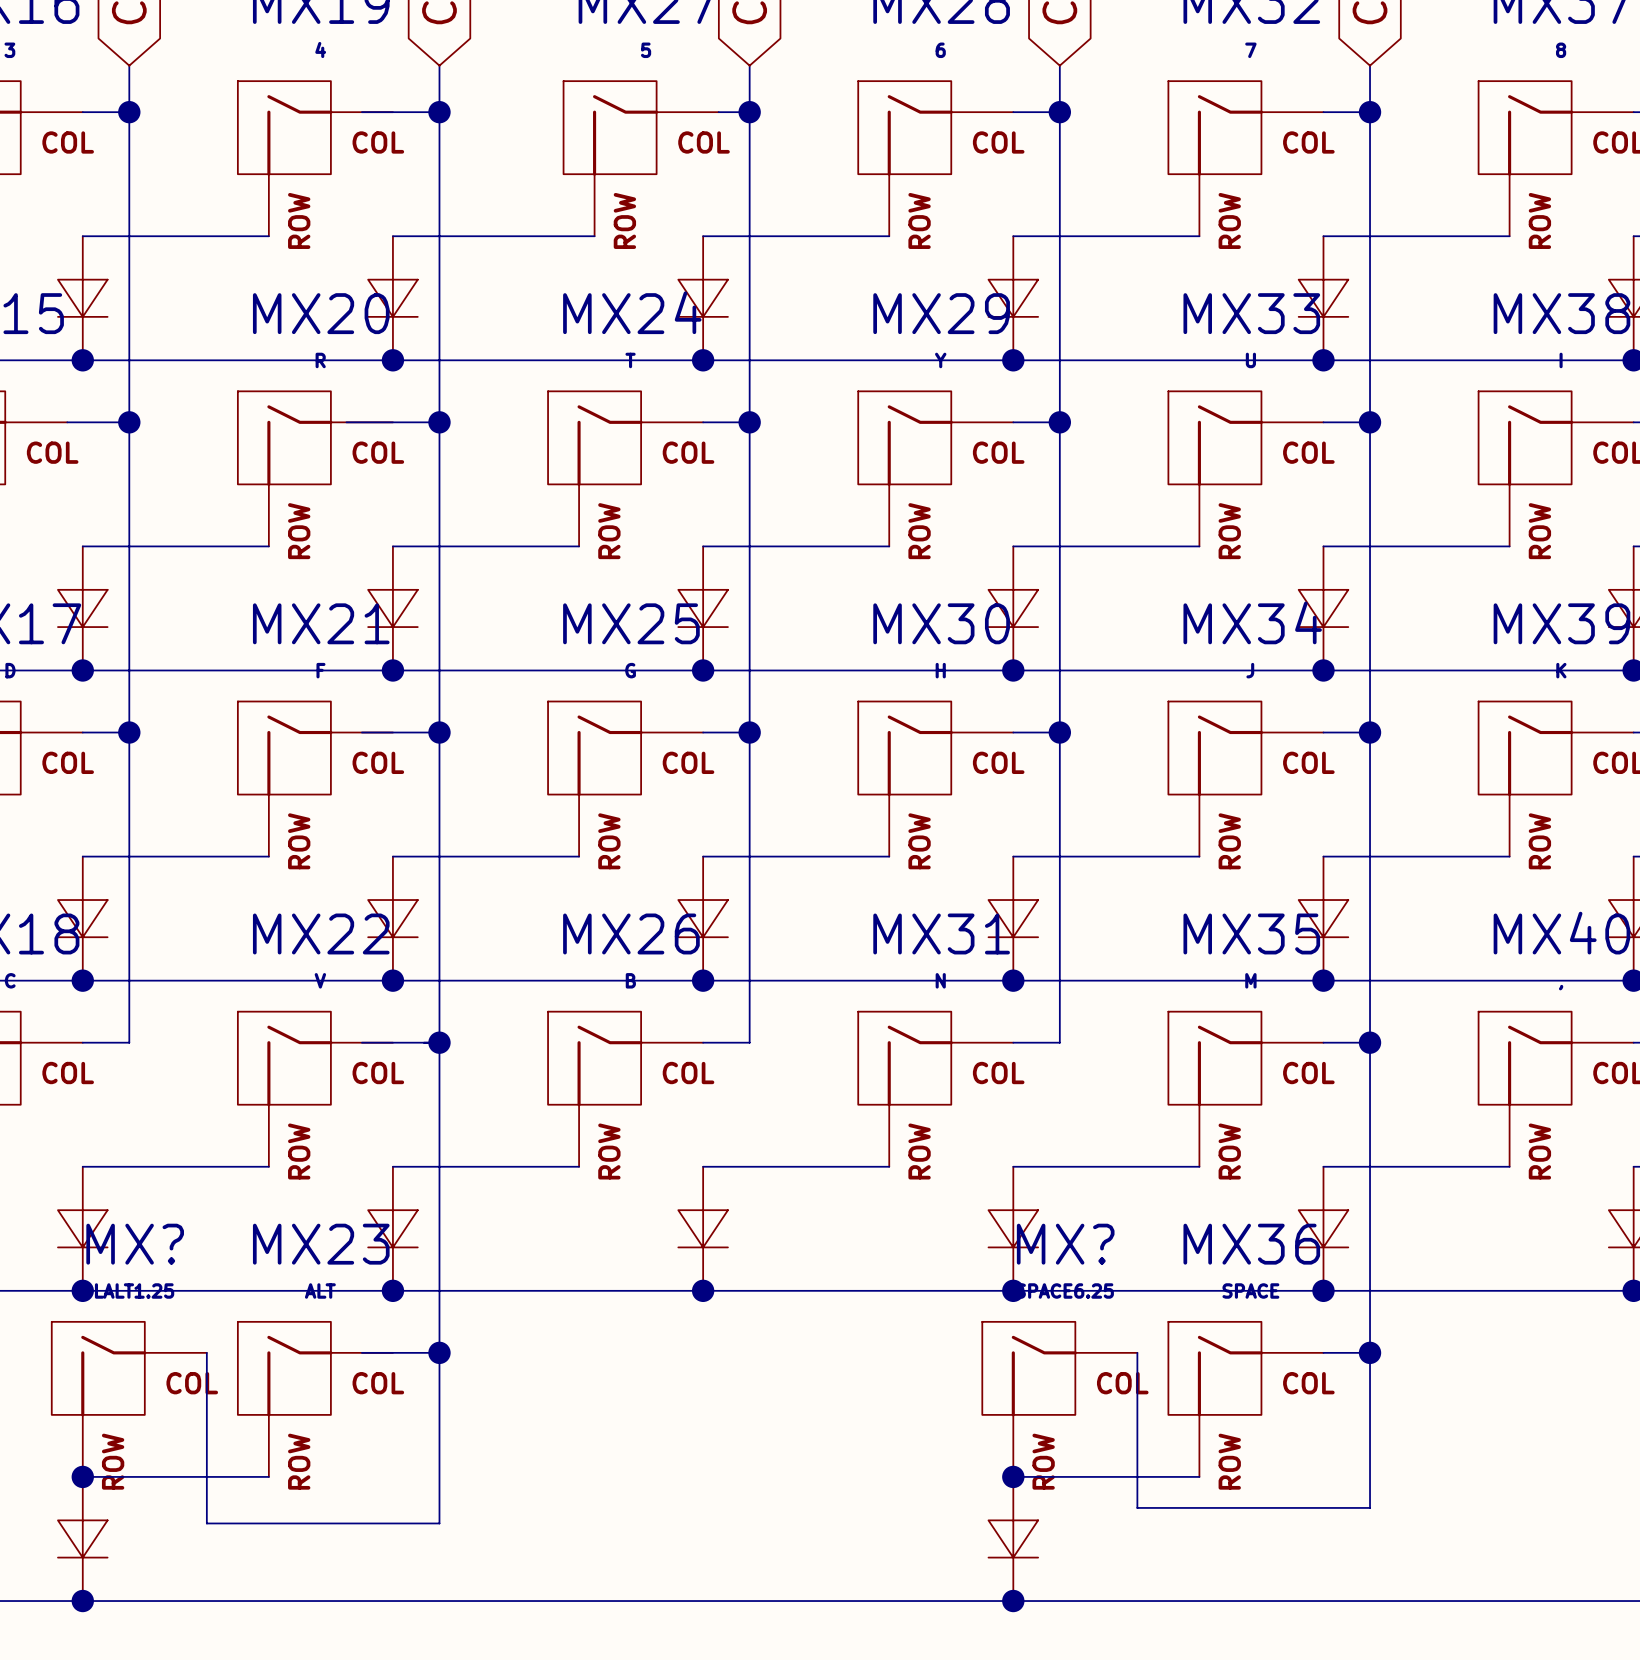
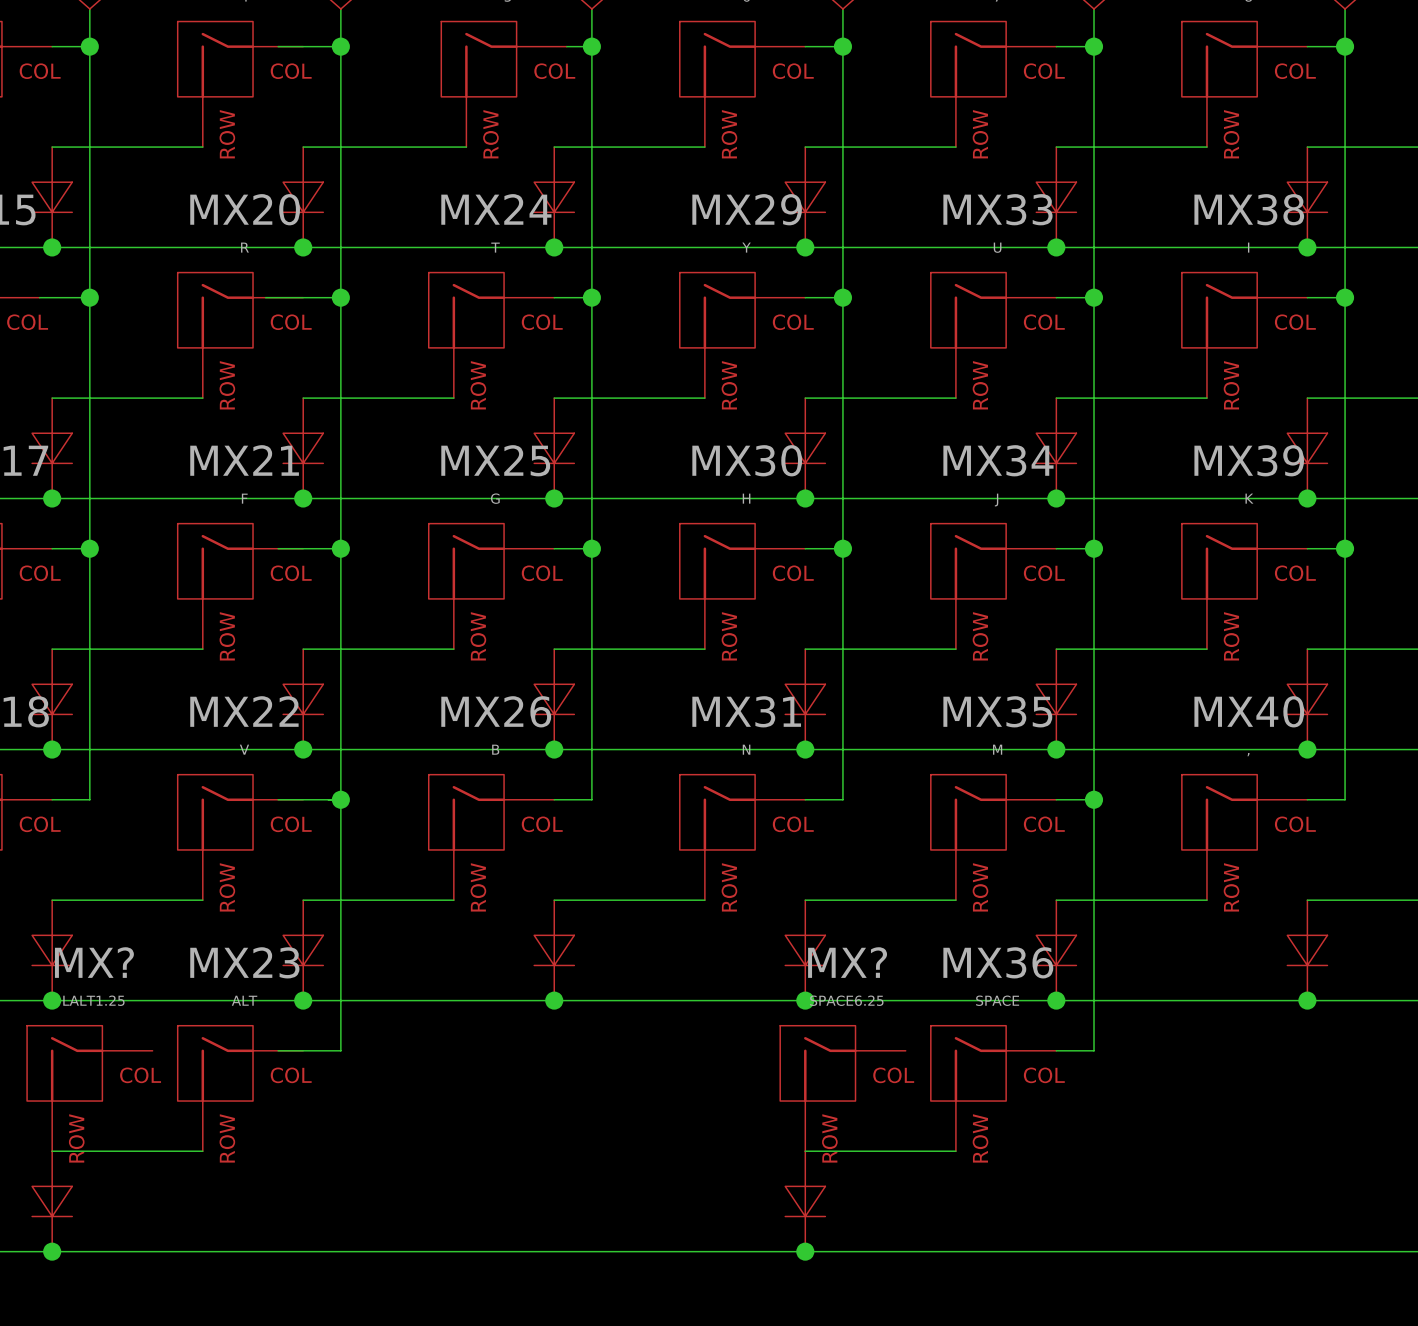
wire: (206, 1352) (206, 1523) (439, 1523) (439, 1352) -> none
junction: (439, 1352) -> none
wire: (1137, 1352) (1137, 1507) (1370, 1507) (1370, 1352) -> none
junction: (1370, 1352) -> none
junction: (82, 1476) -> none
junction: (1013, 1476) -> none

